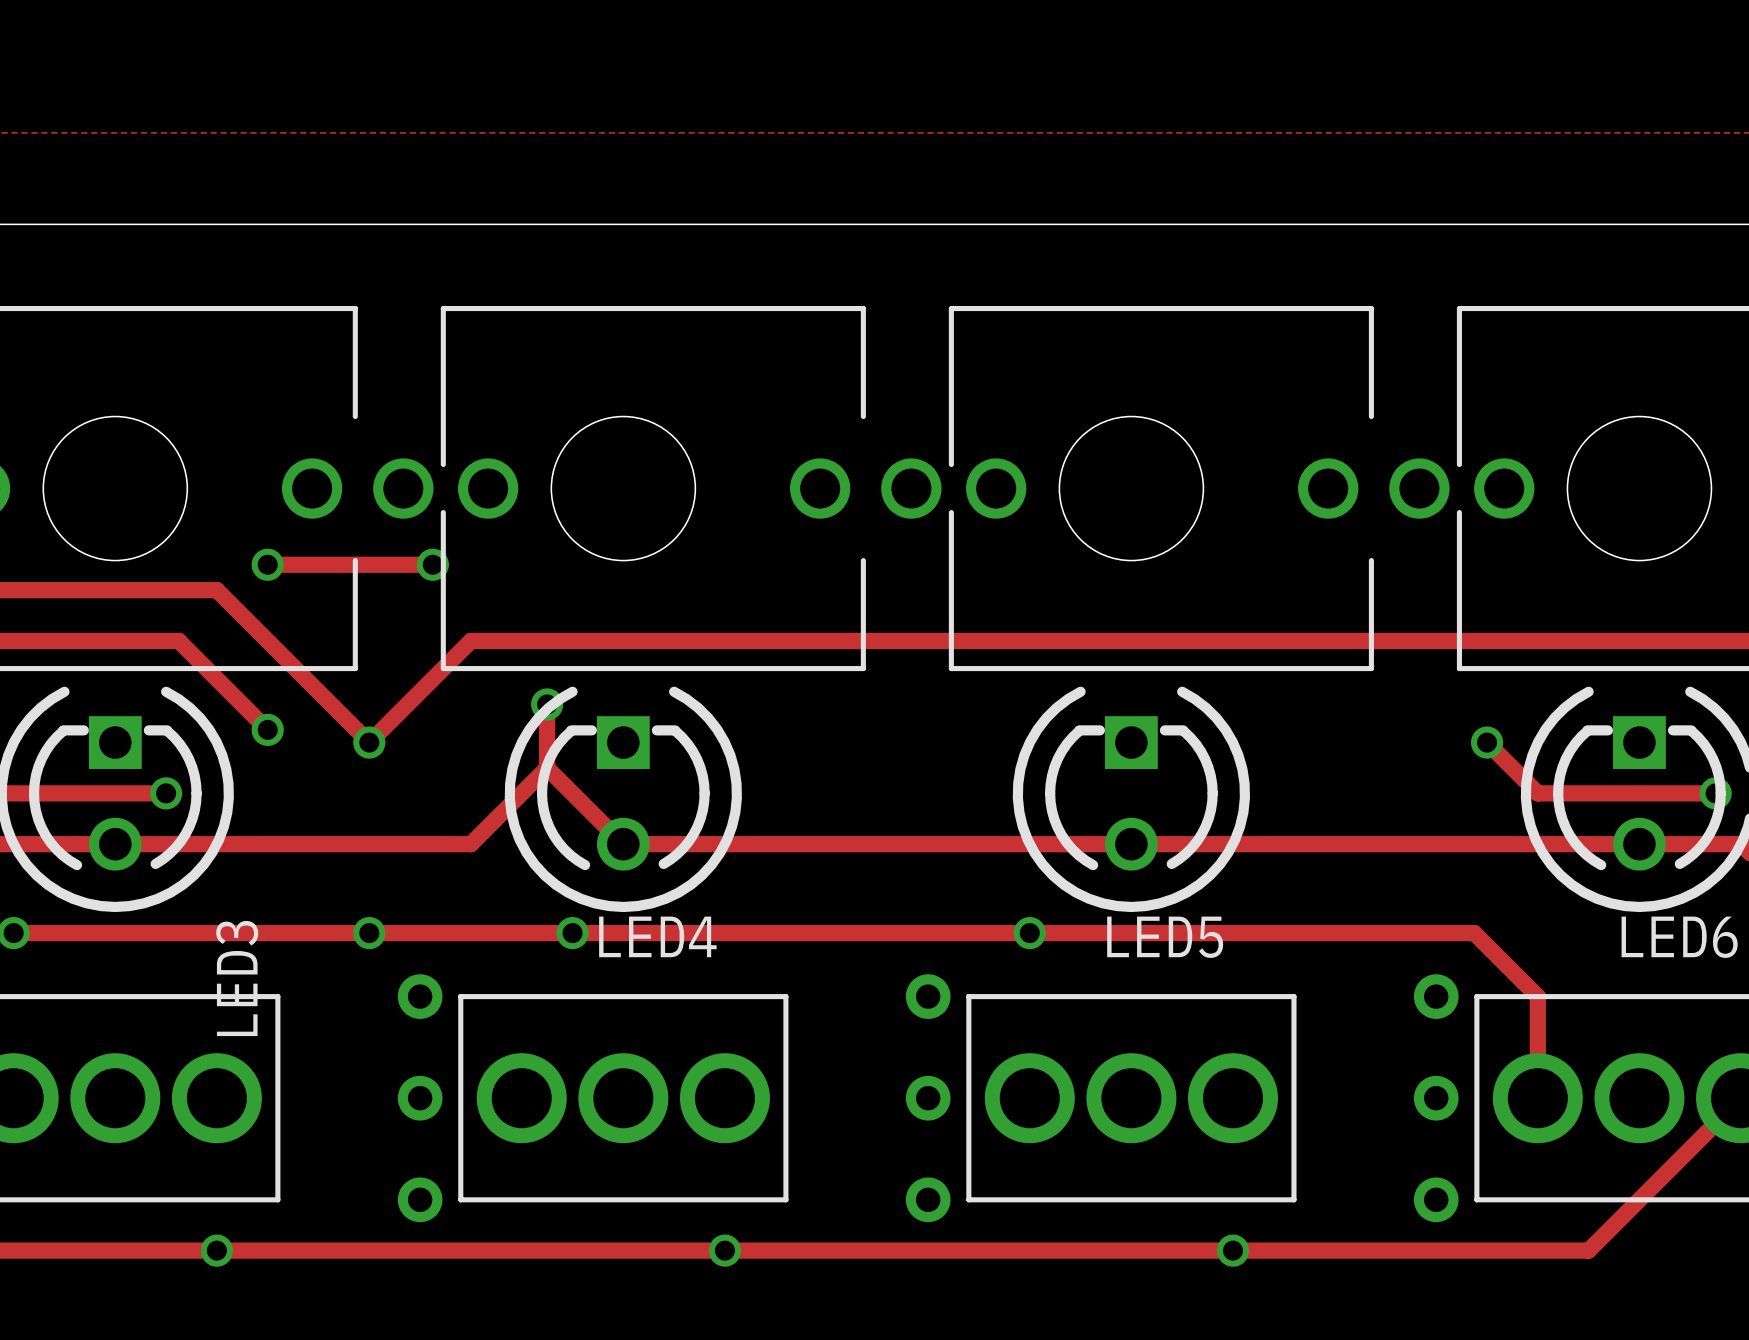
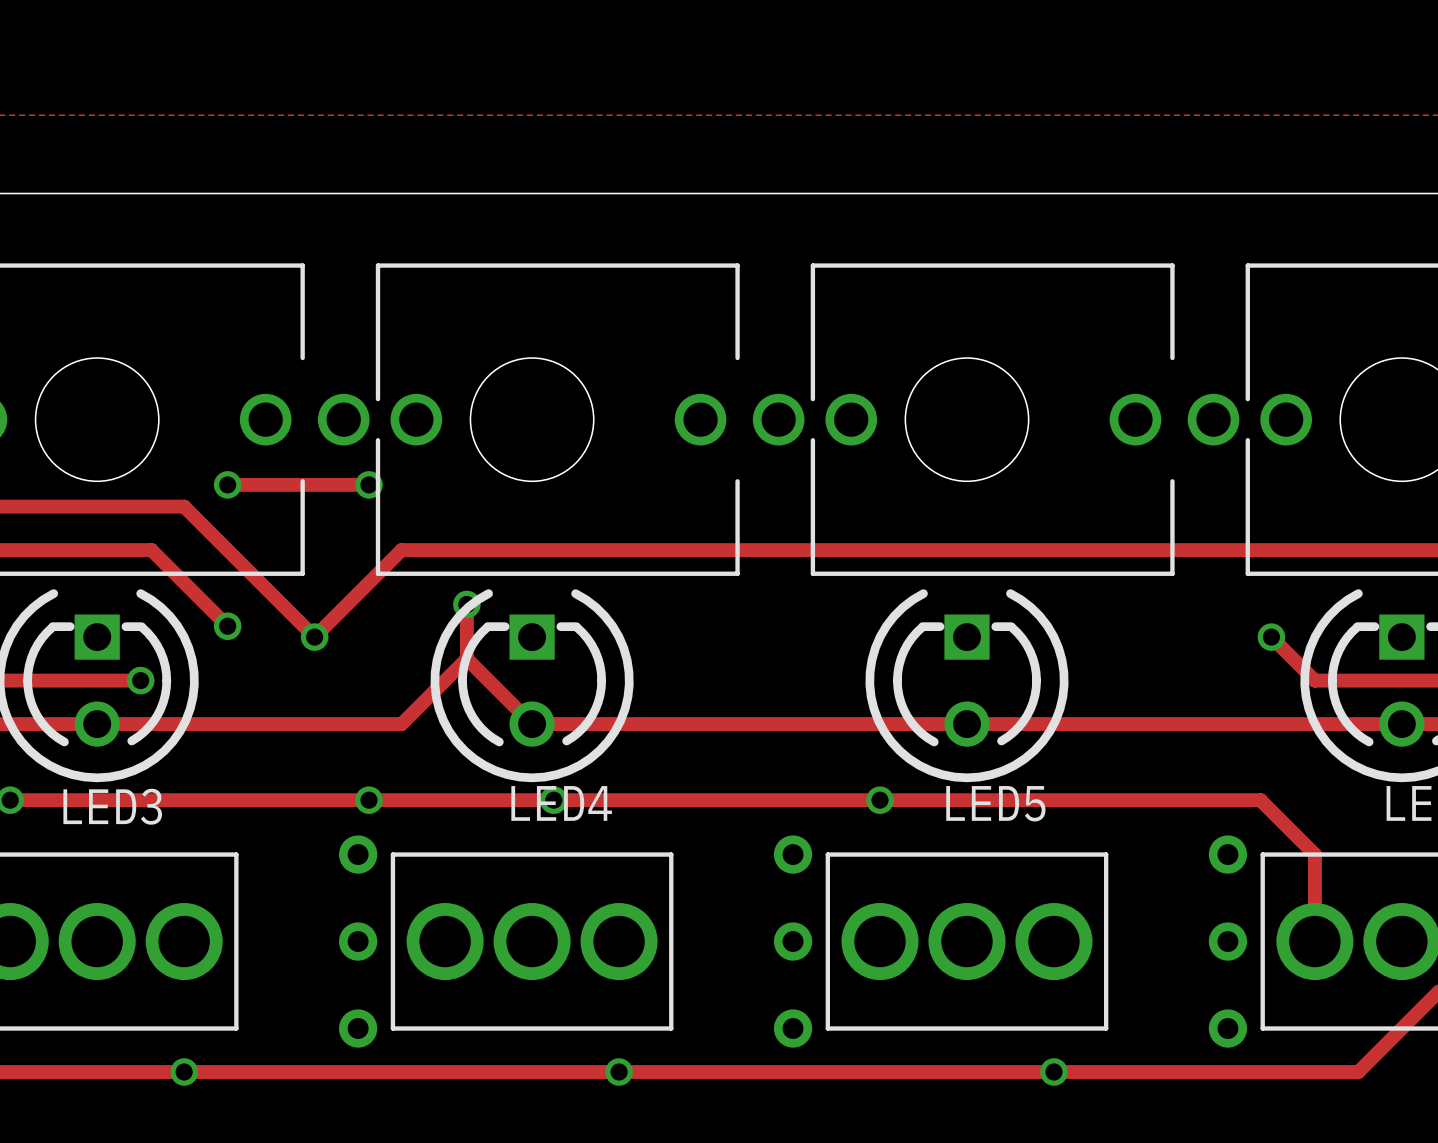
via position: (369, 933) -> (369, 800)
via: (572, 933) -> none
via: none -> (553, 800)
LED3 name rotation: 0° (237, 978) -> 90° clockwise (112, 806)

